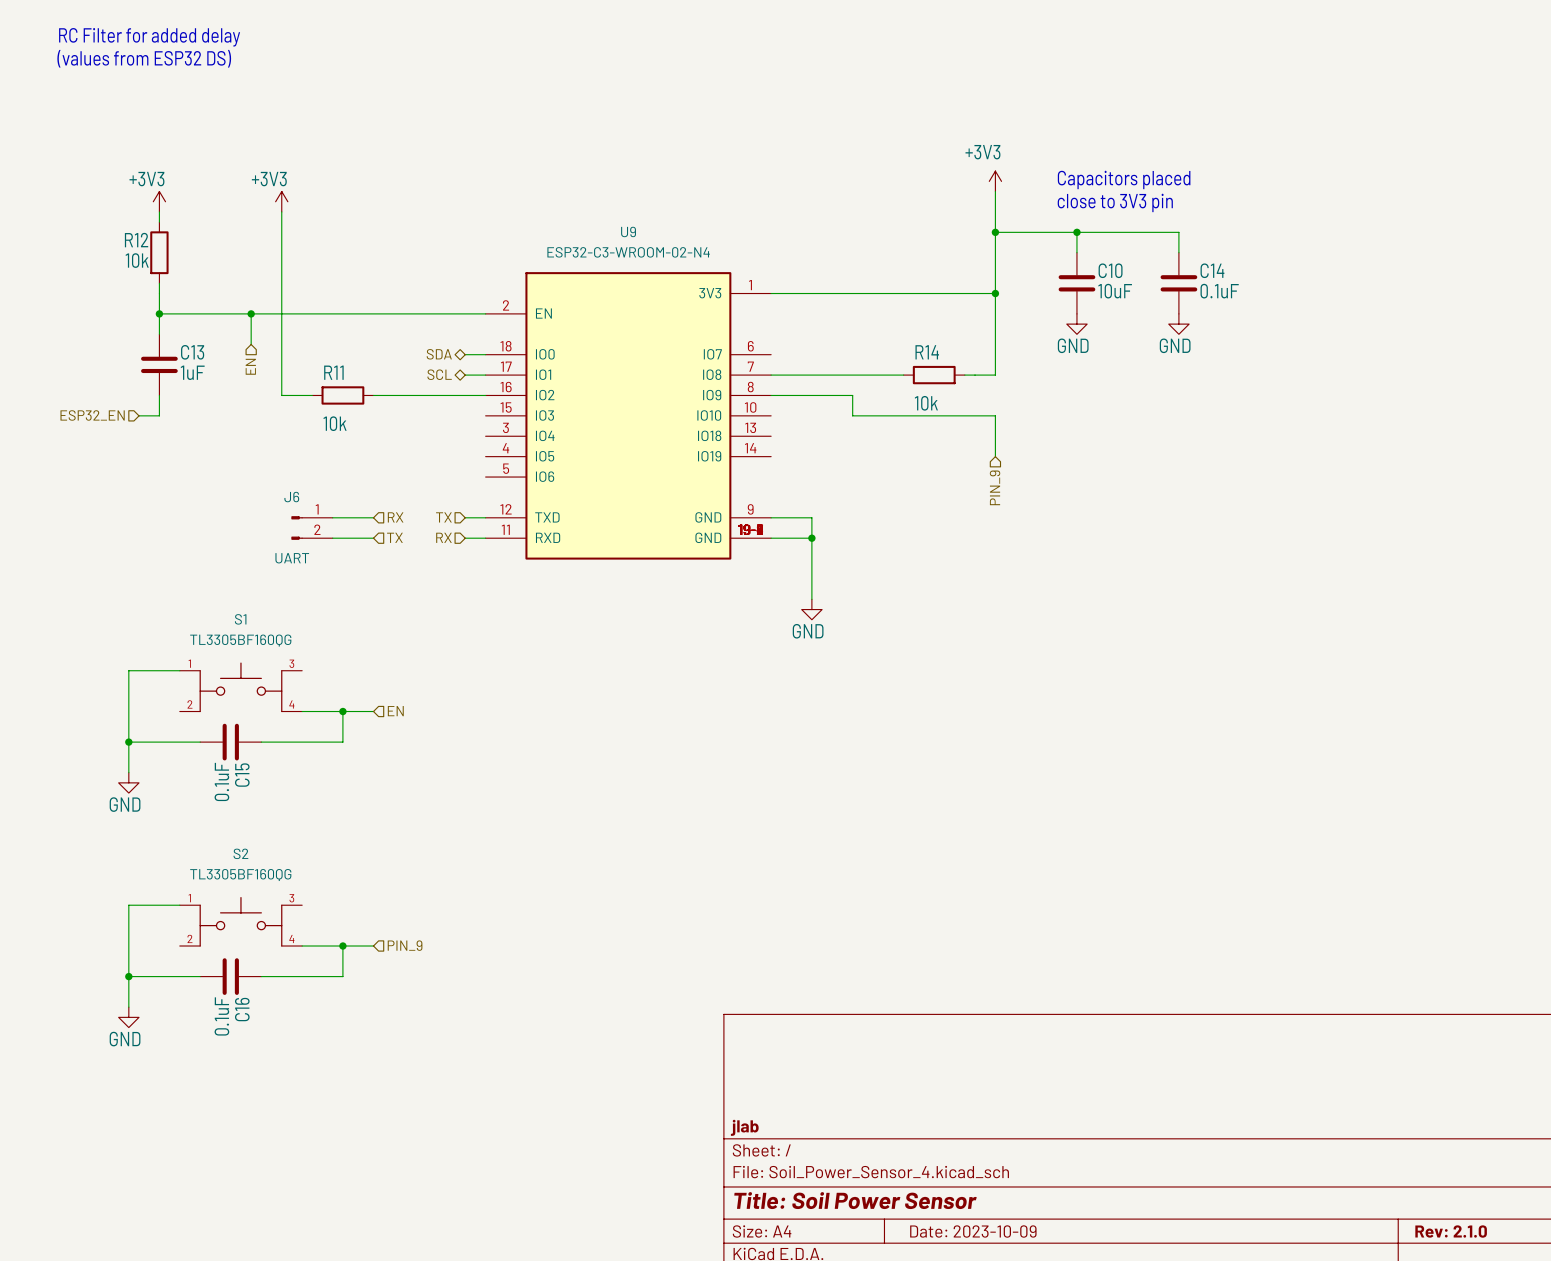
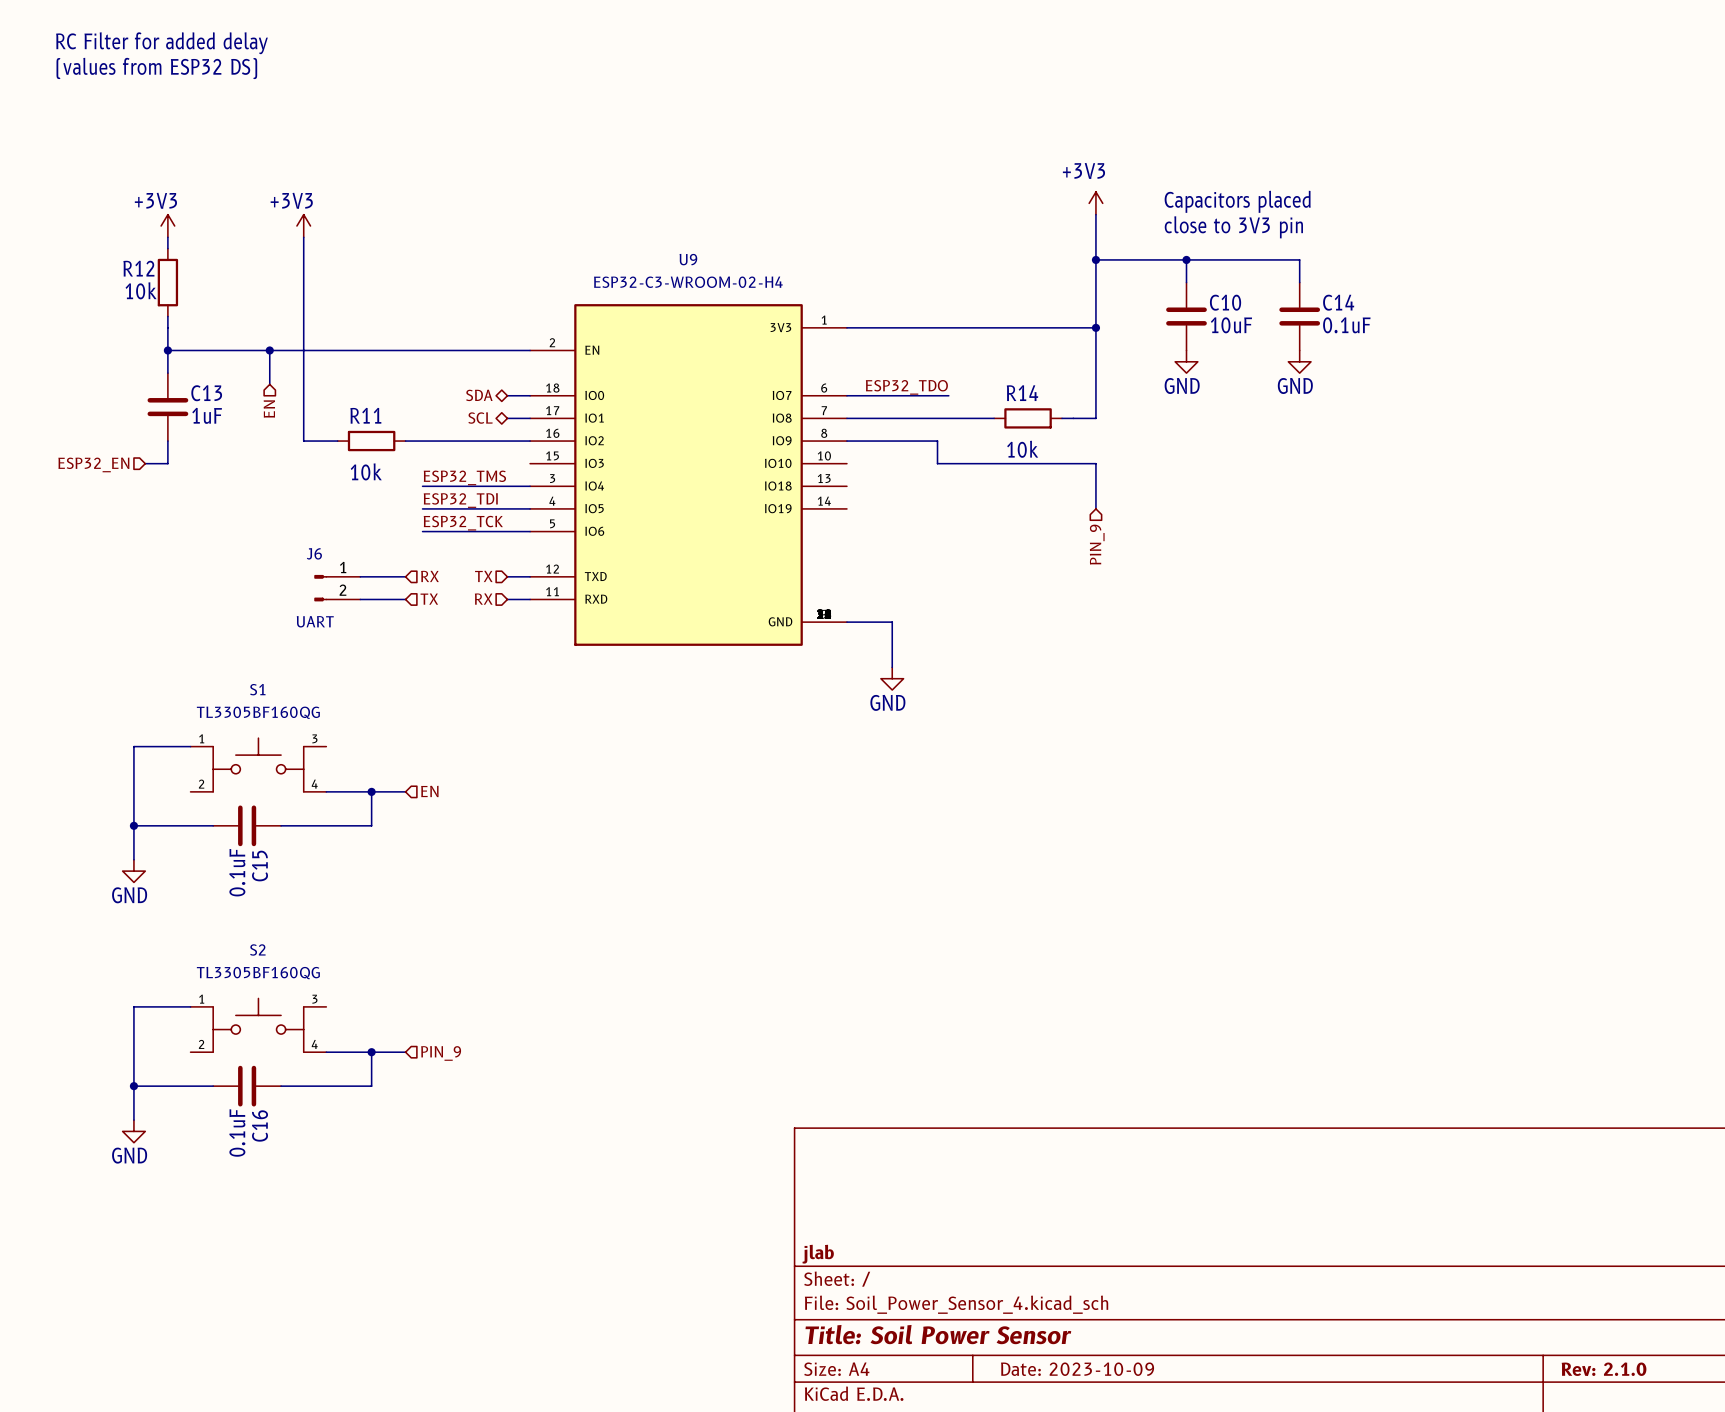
U9 value: ESP32-C3-WROOM-02-N4 (628, 252) -> ESP32-C3-WROOM-02-H4 (688, 282)
U9 symbol: [485, 272, 772, 560] -> [530, 304, 847, 646]
label: none -> ESP32_TDO (906, 387)
wire: none -> (846, 395) (948, 395)
label: none -> ESP32_TMS (464, 477)
wire: none -> (422, 486) (530, 486)
label: none -> ESP32_TDI (460, 500)
wire: none -> (422, 508) (530, 508)
label: none -> ESP32_TCK (463, 523)
wire: none -> (422, 531) (530, 531)
wire: (771, 517) (811, 517) (811, 558) -> (846, 622) (892, 622)
wire: (771, 538) (811, 538) -> none
junction: (811, 538) -> none

